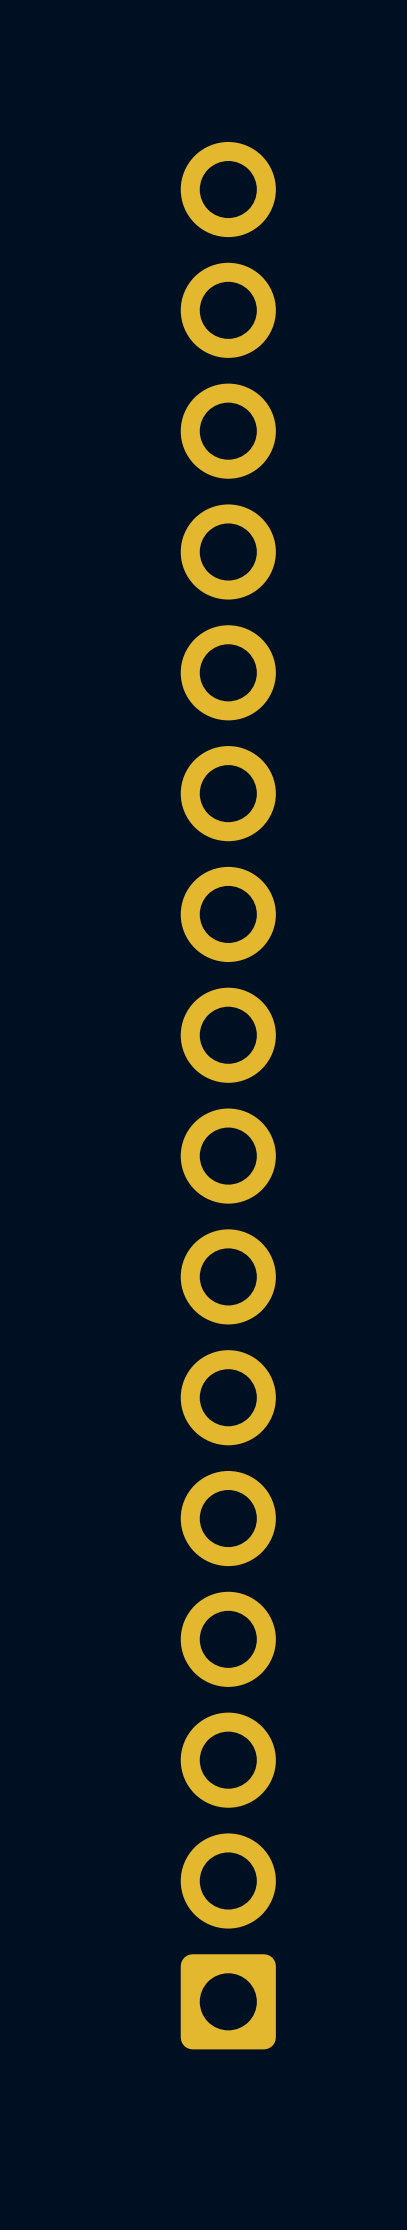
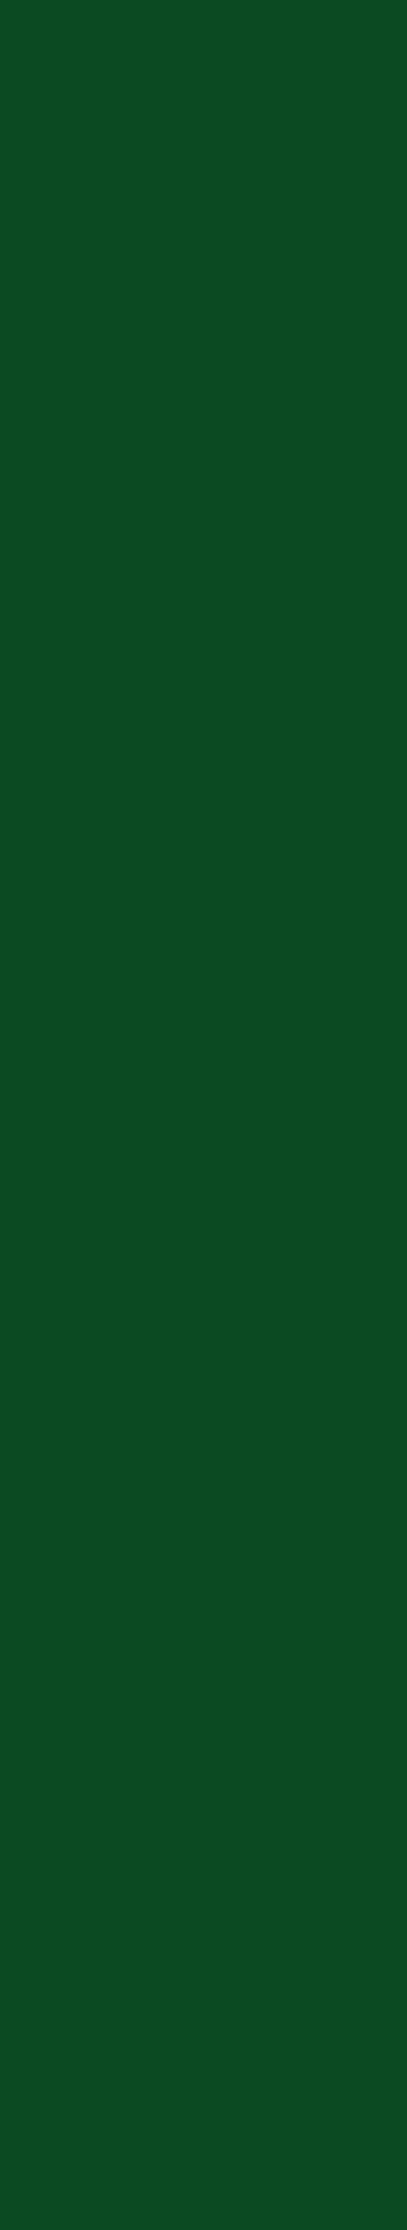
part: (228, 1095) -> none

